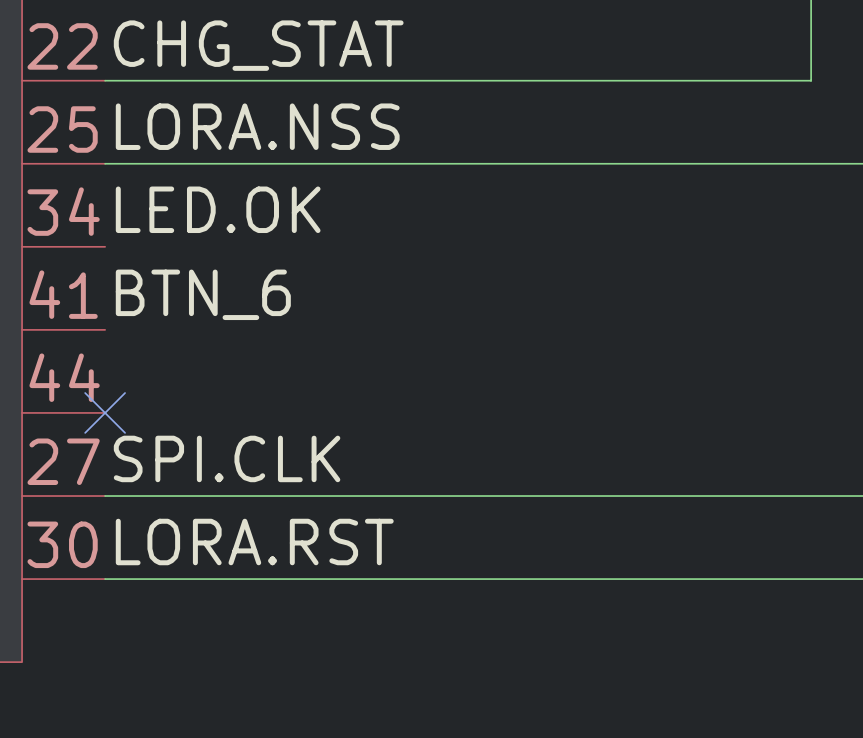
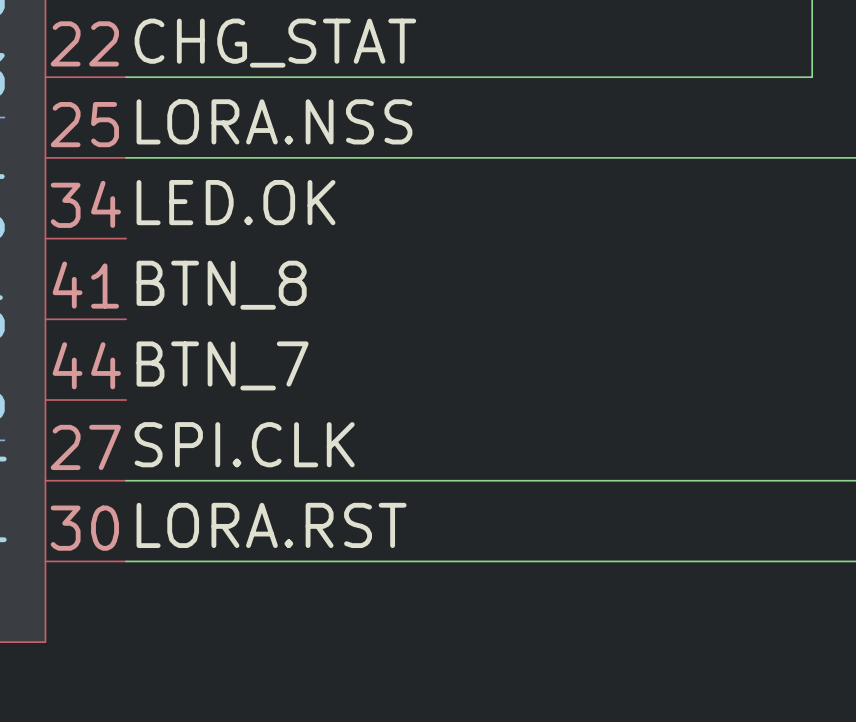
label: BTN_6 (203, 294) -> BTN_8 (221, 285)
label: none -> BTN_7 (222, 365)
no-connect mark: (105, 412) -> none

